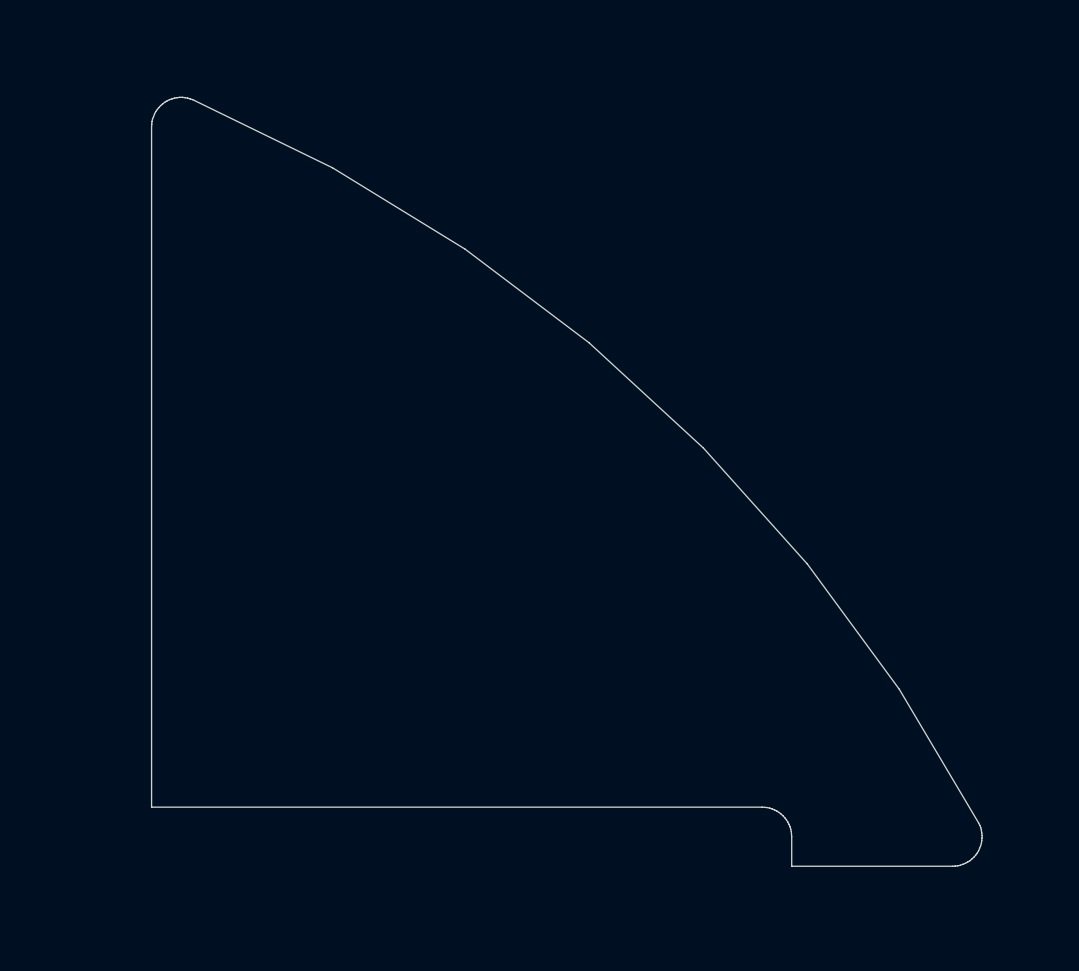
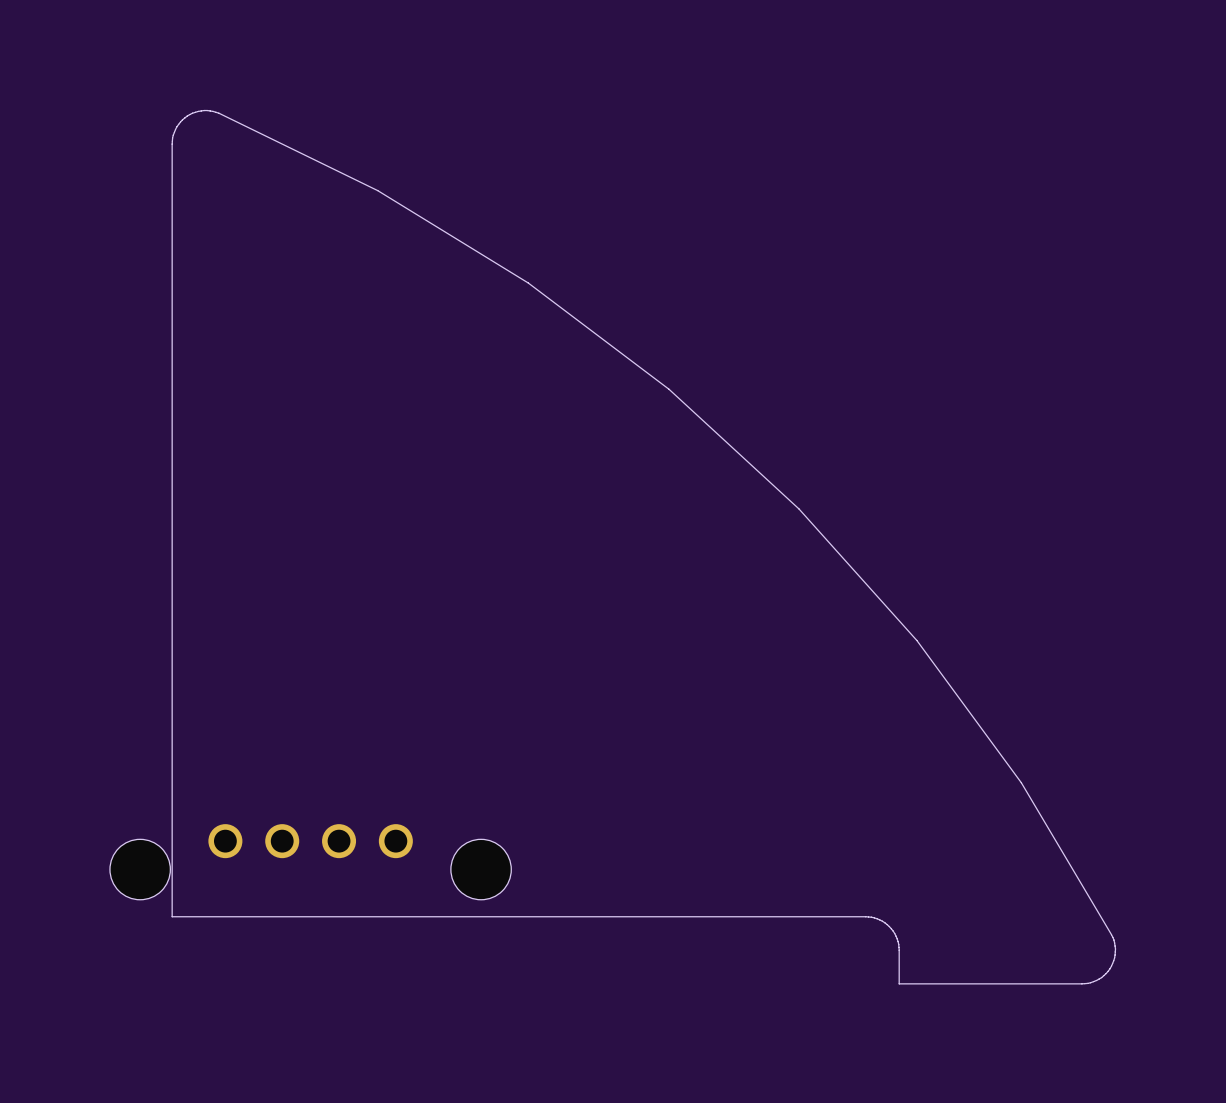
part: none -> (310, 861)

